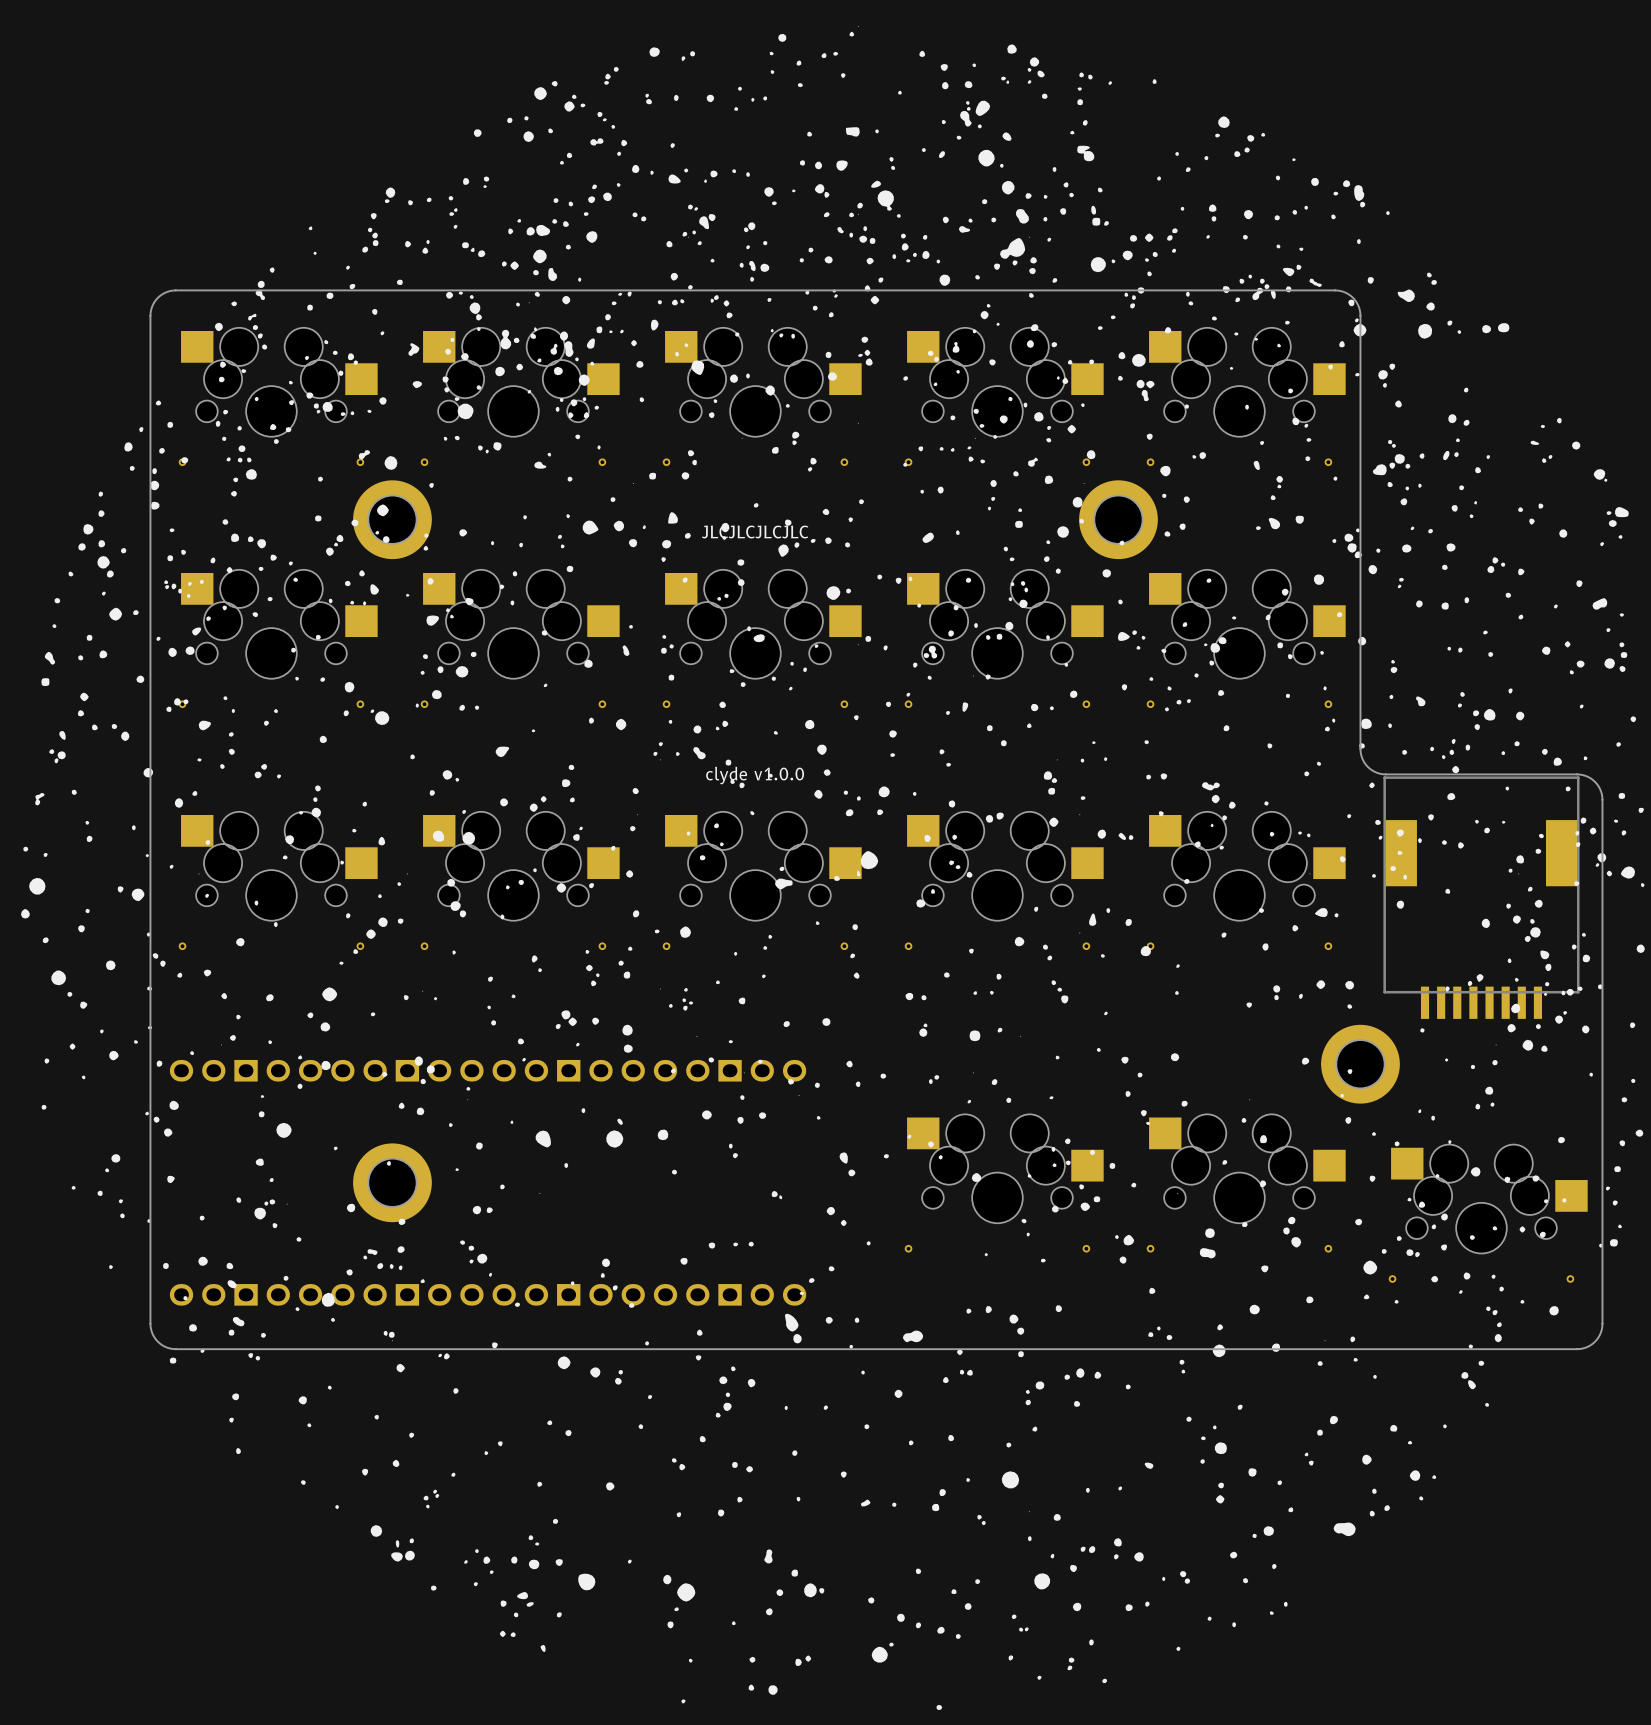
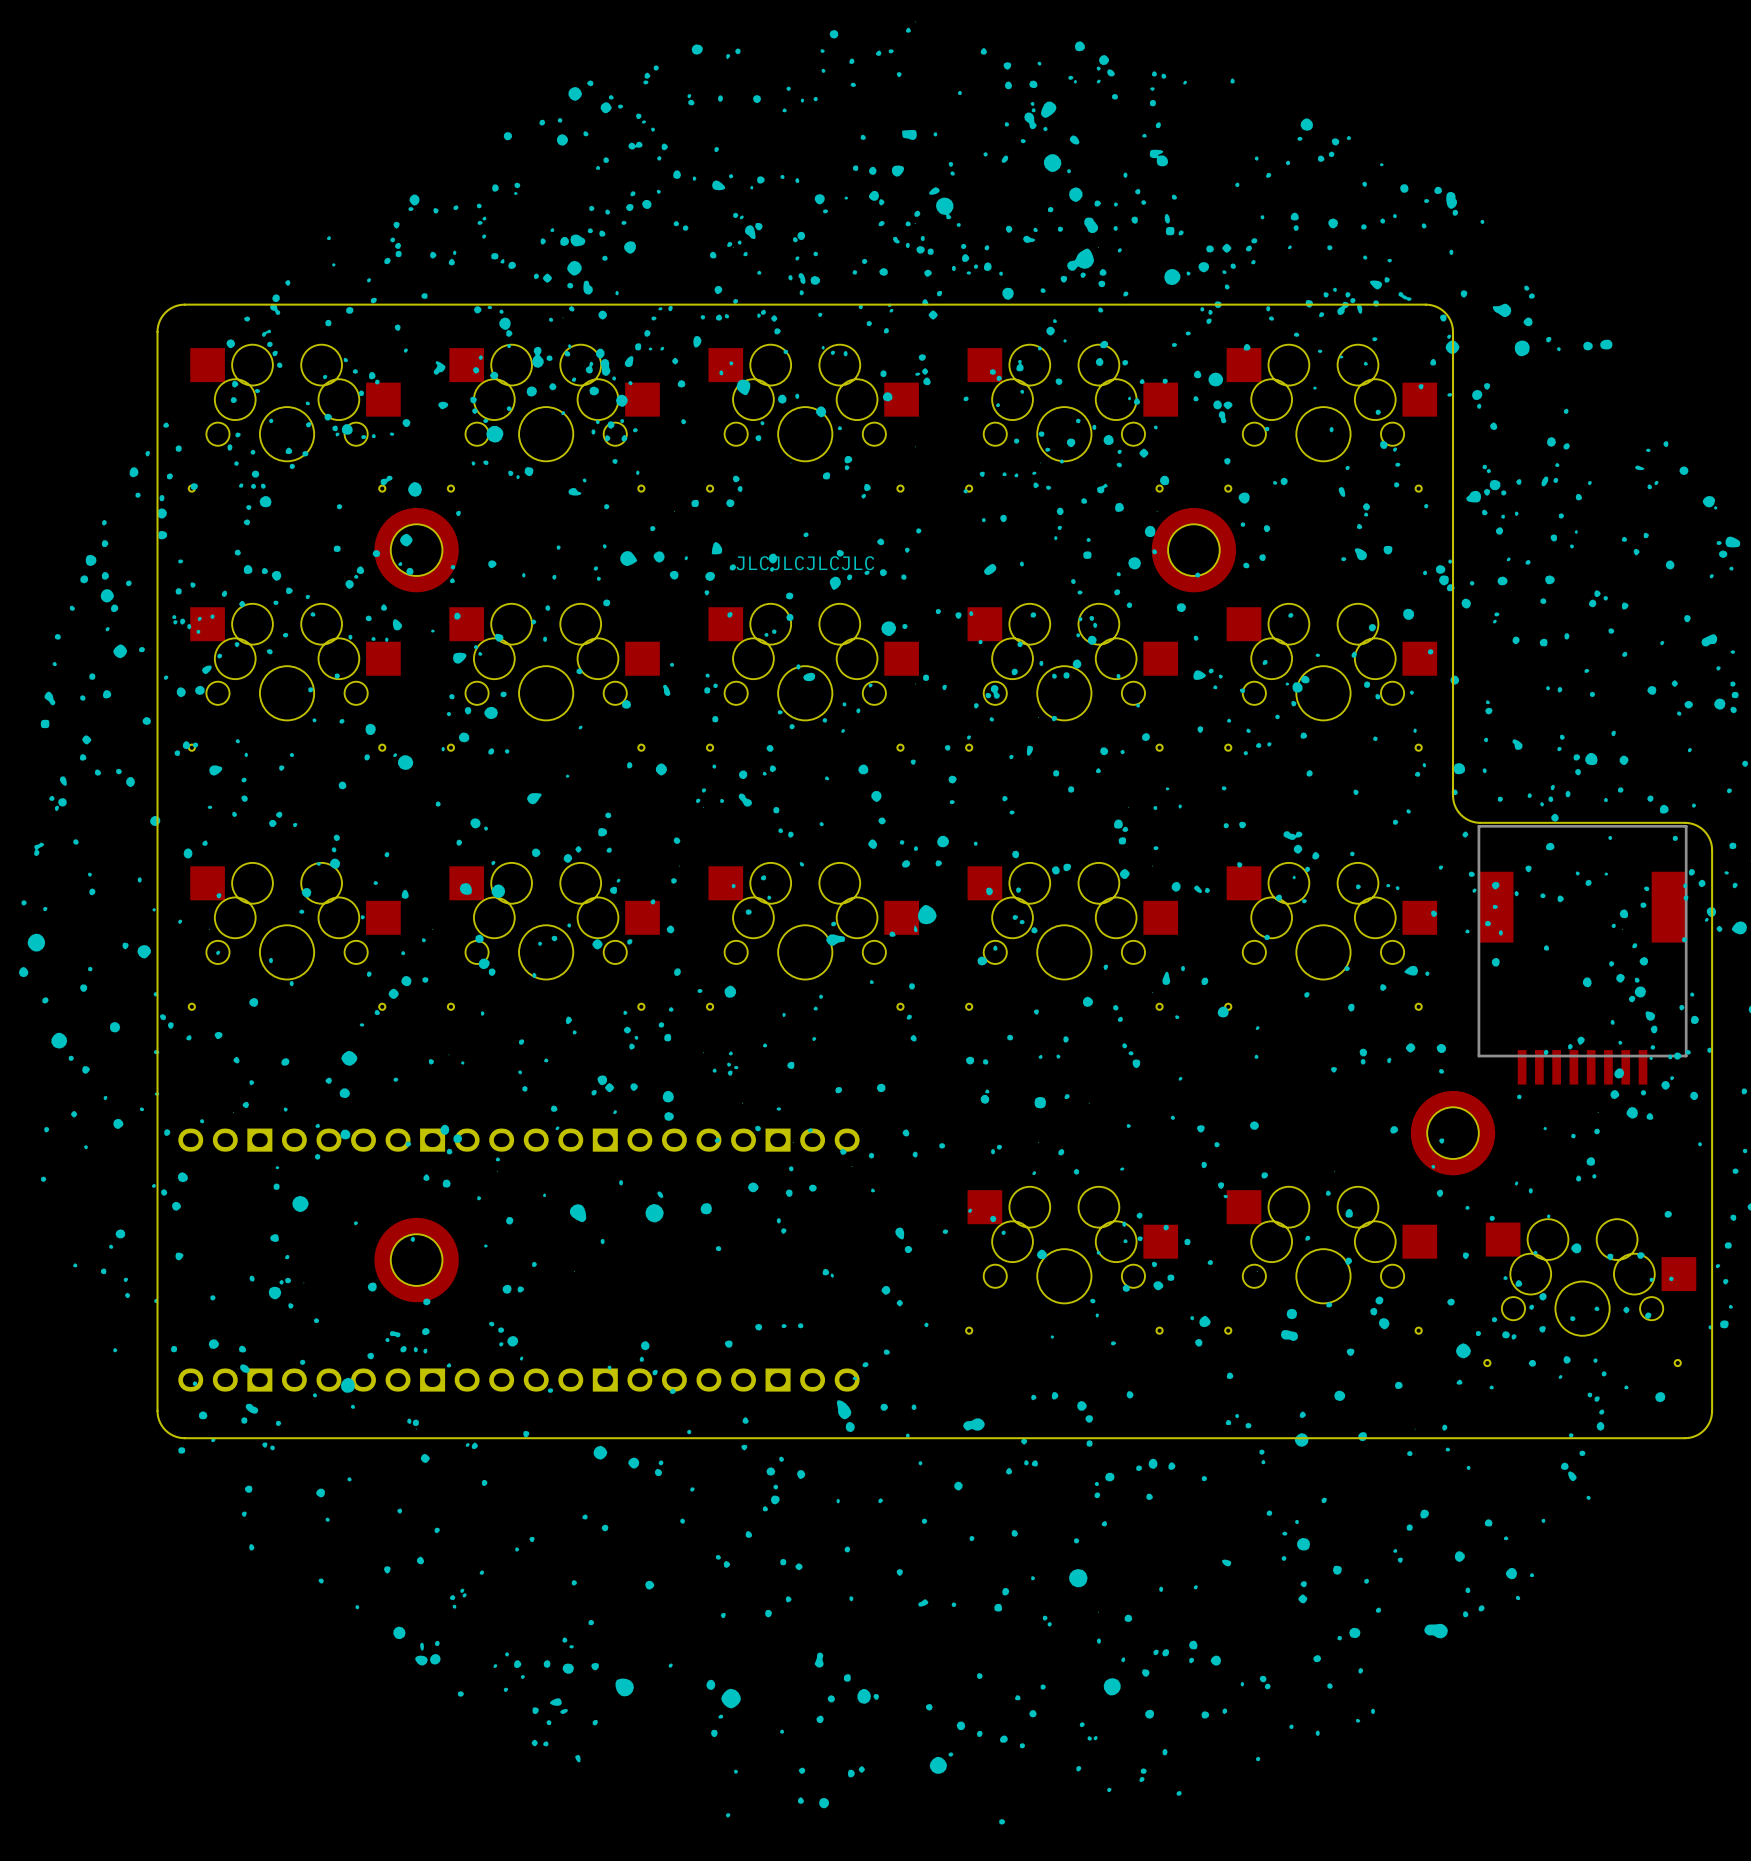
text: clyde v1.0.0 (755, 775) -> none

